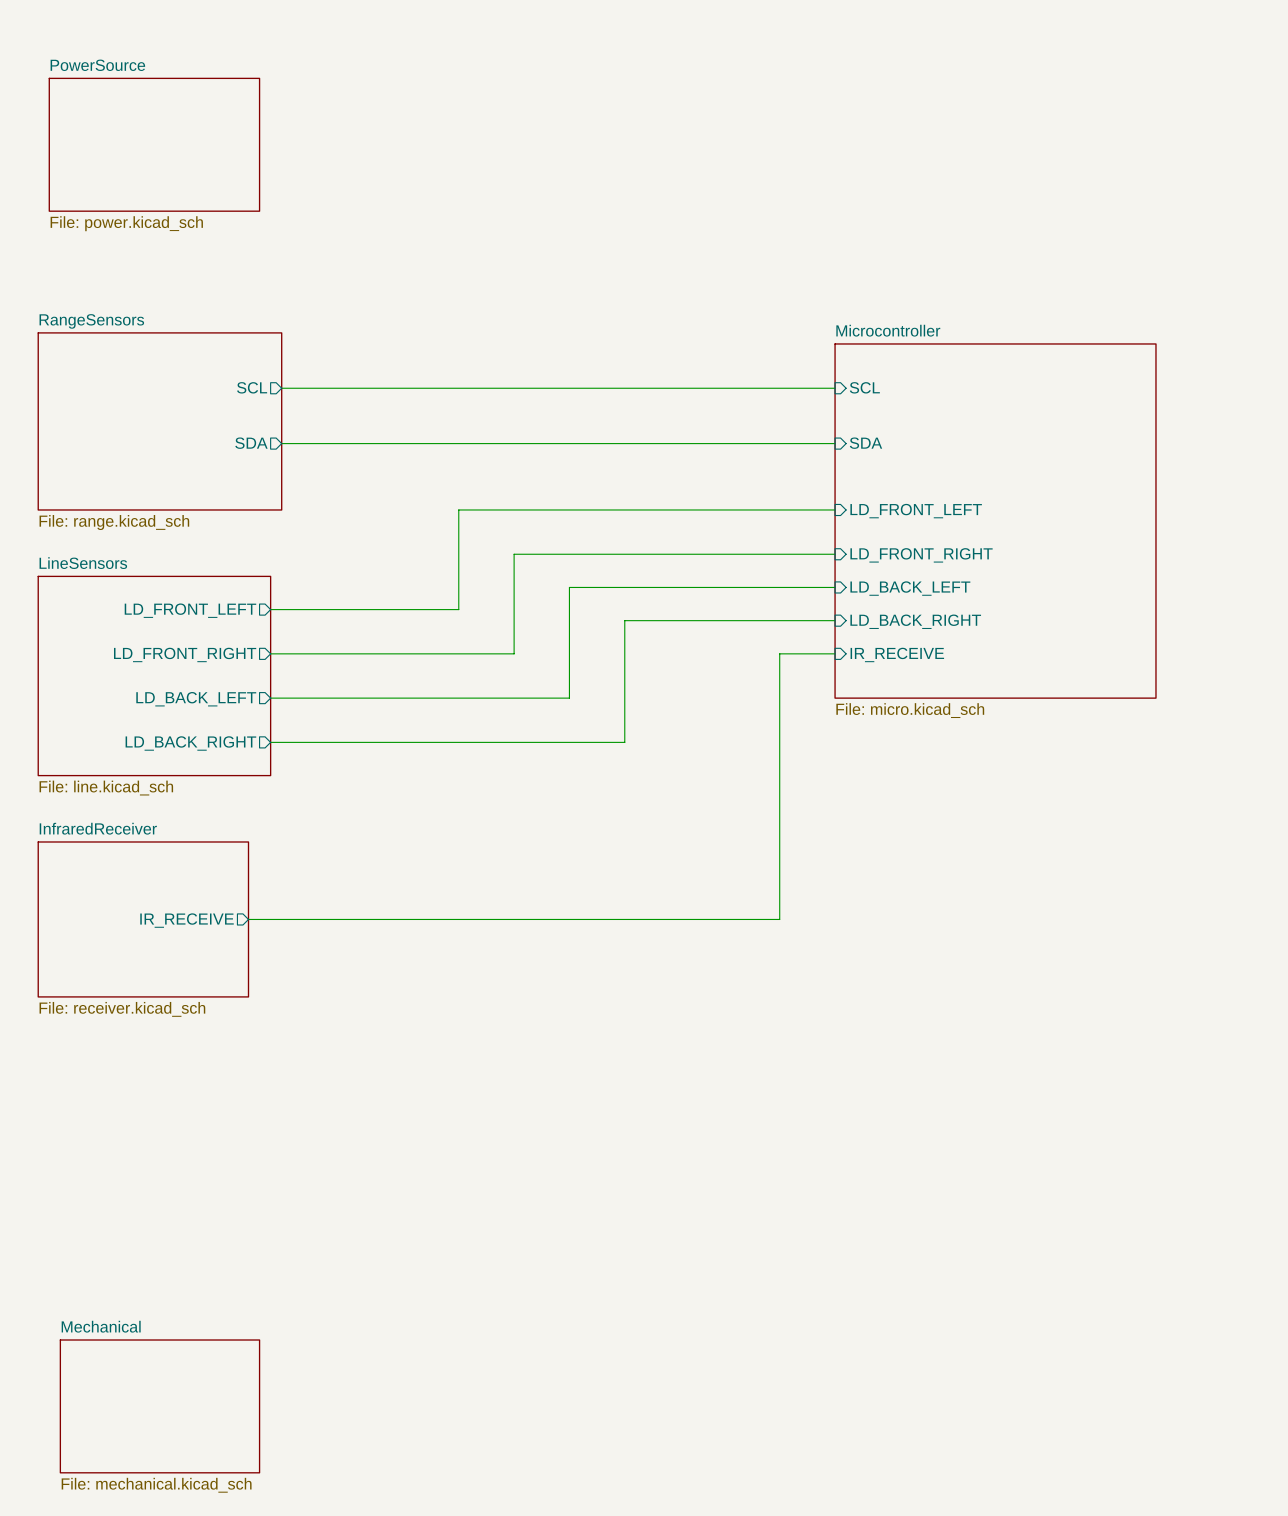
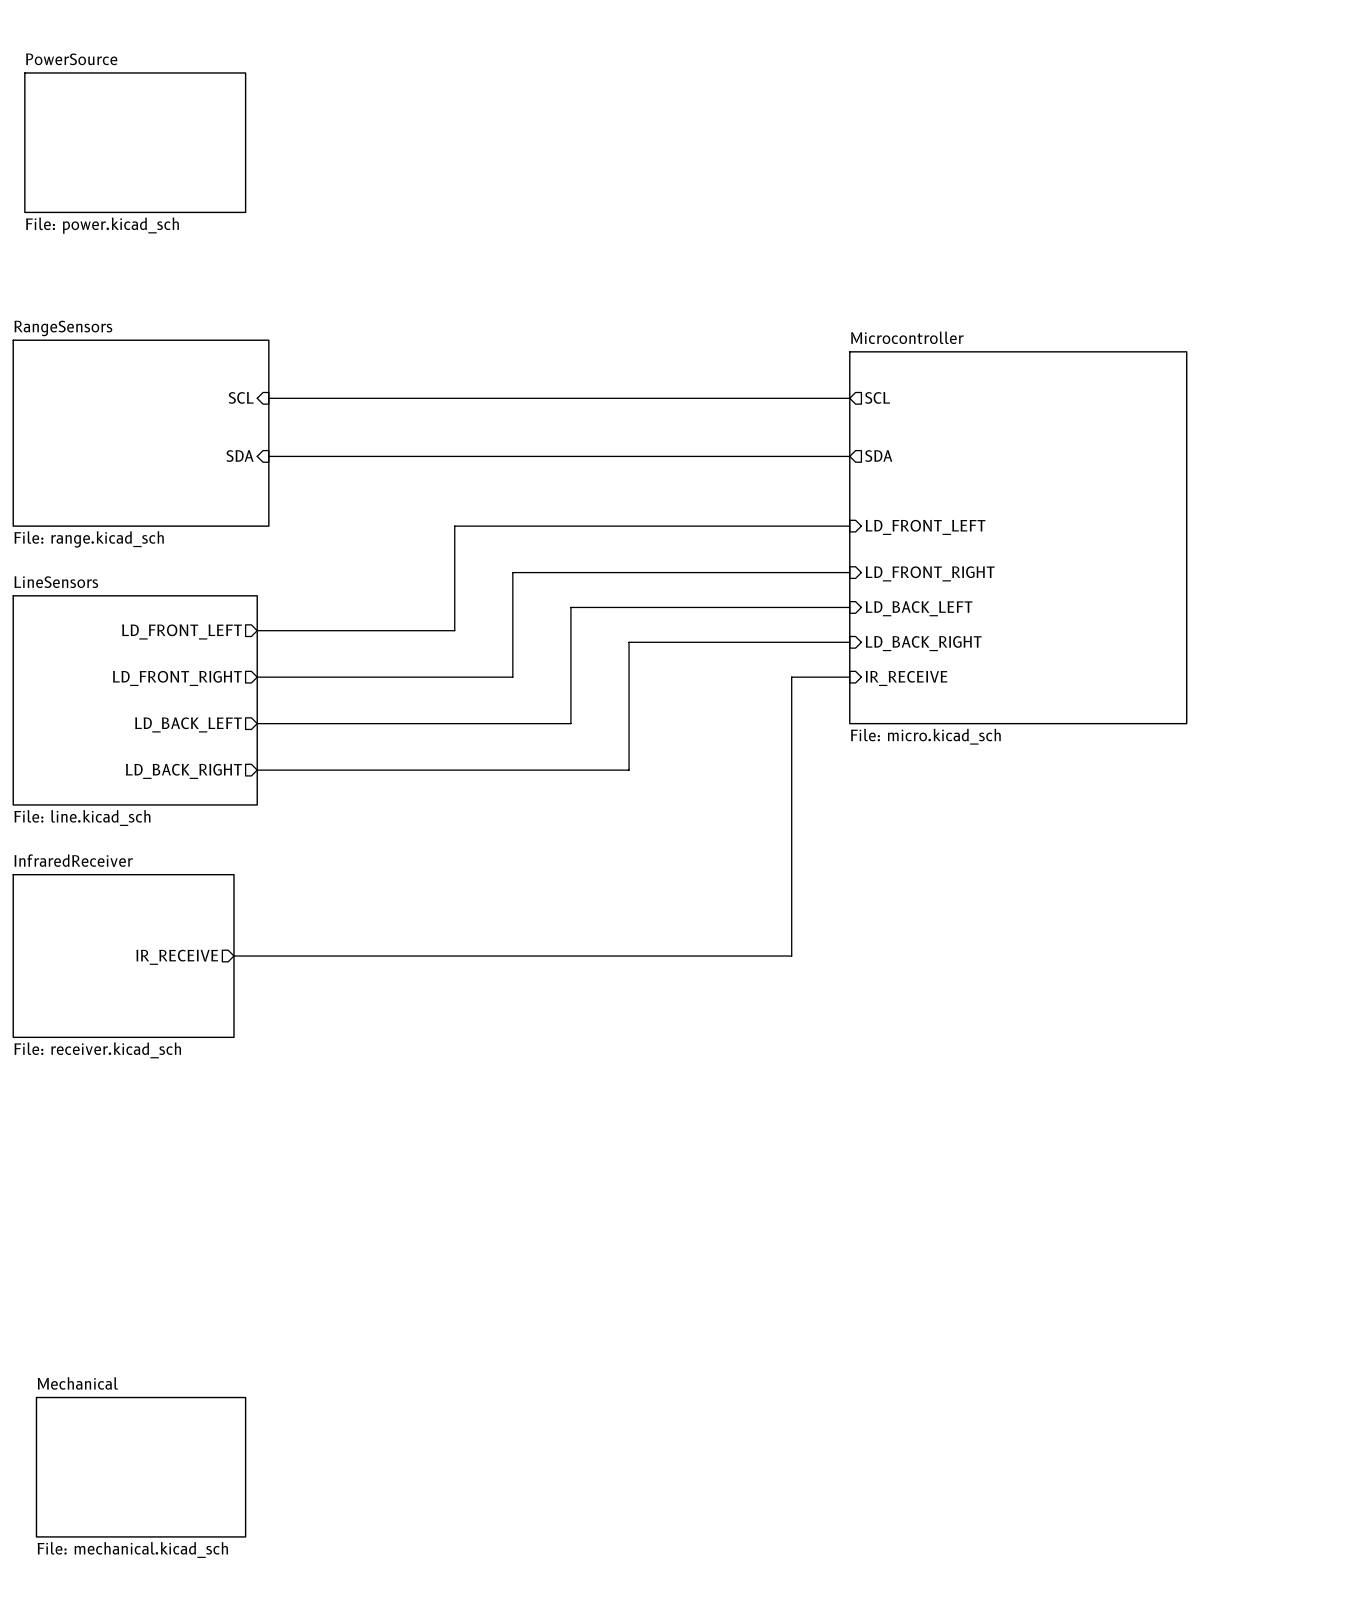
sheet pin shape: output (252, 387) -> input (241, 397)
sheet pin shape: input (864, 387) -> output (877, 397)
sheet pin shape: output (251, 443) -> input (240, 456)
sheet pin shape: input (865, 443) -> output (878, 456)

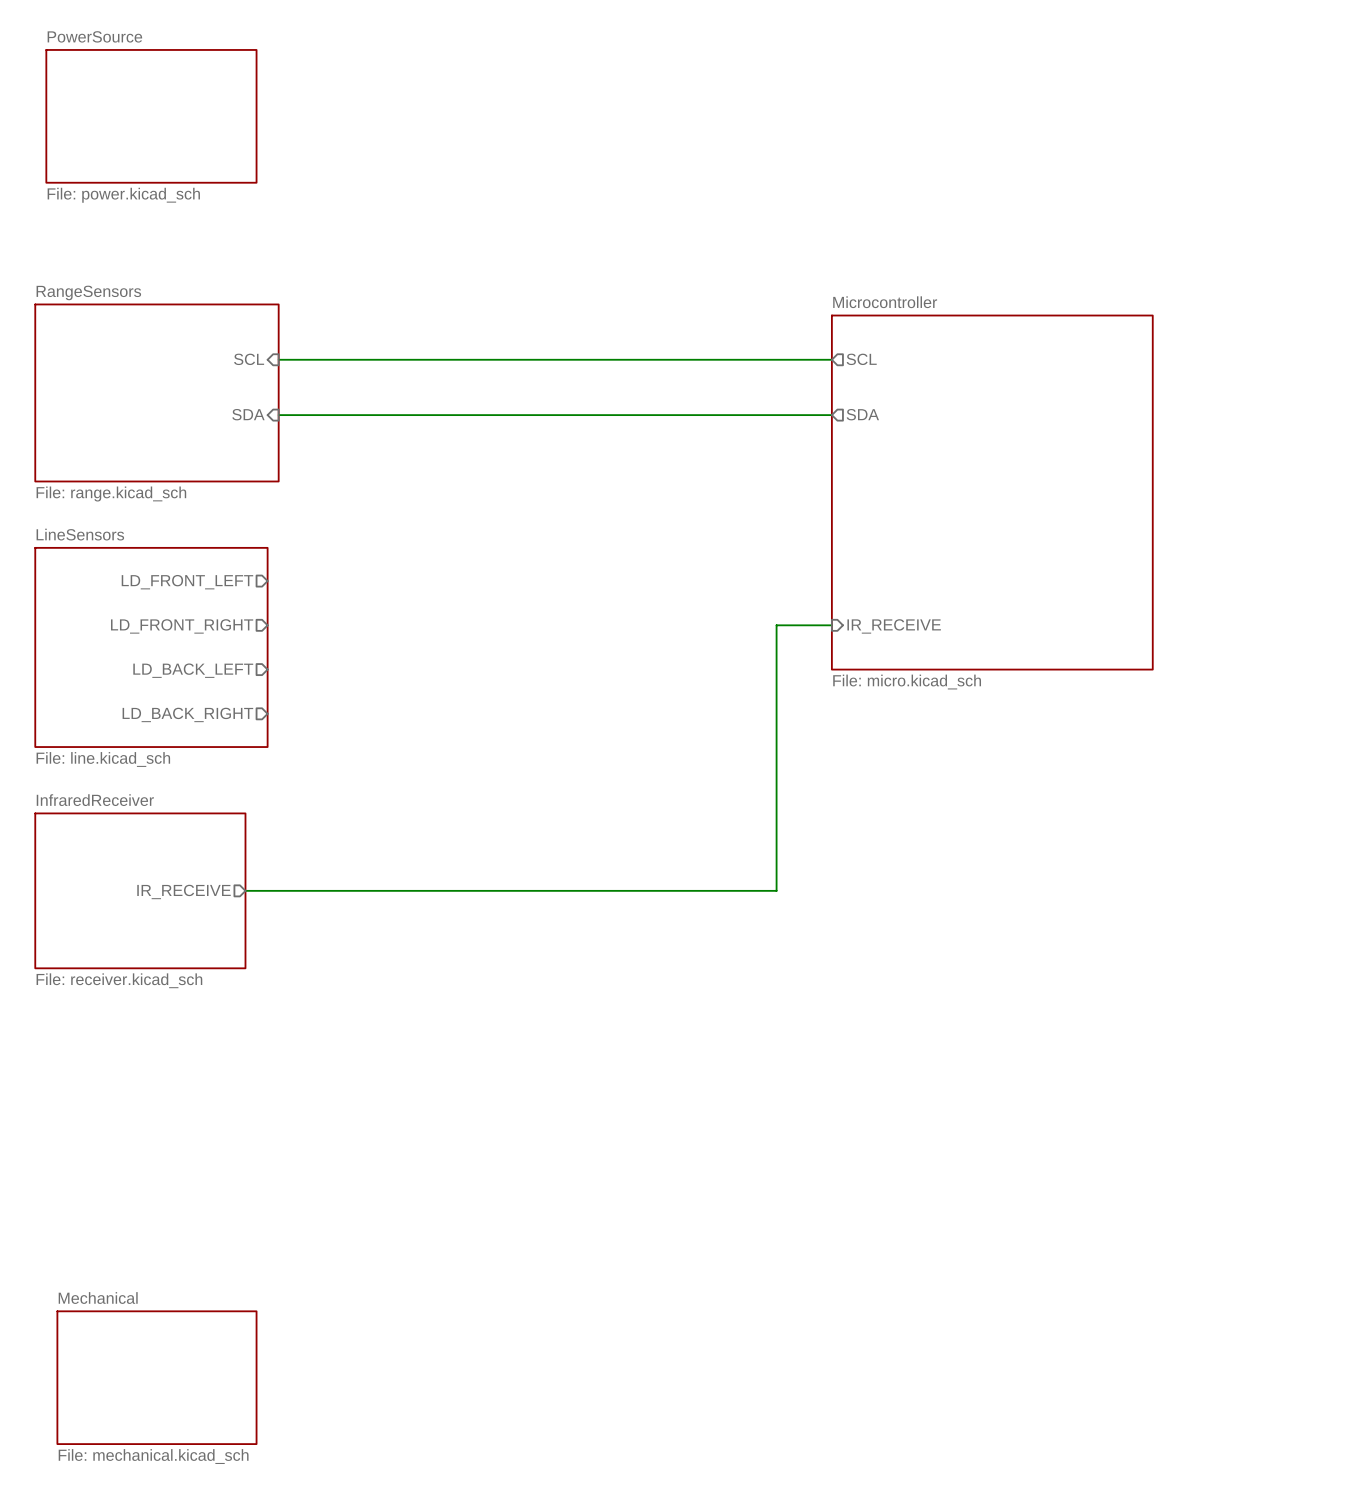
wire: (849, 526) (454, 526) (454, 630) (257, 630) -> none
sheet pin: LD_FRONT_LEFT (925, 527) -> none
wire: (849, 572) (512, 572) (512, 677) (257, 677) -> none
sheet pin: LD_FRONT_RIGHT (930, 573) -> none
wire: (849, 607) (570, 607) (570, 723) (257, 723) -> none
sheet pin: LD_BACK_LEFT (919, 608) -> none
wire: (849, 642) (629, 642) (629, 770) (257, 770) -> none
sheet pin: LD_BACK_RIGHT (923, 643) -> none

